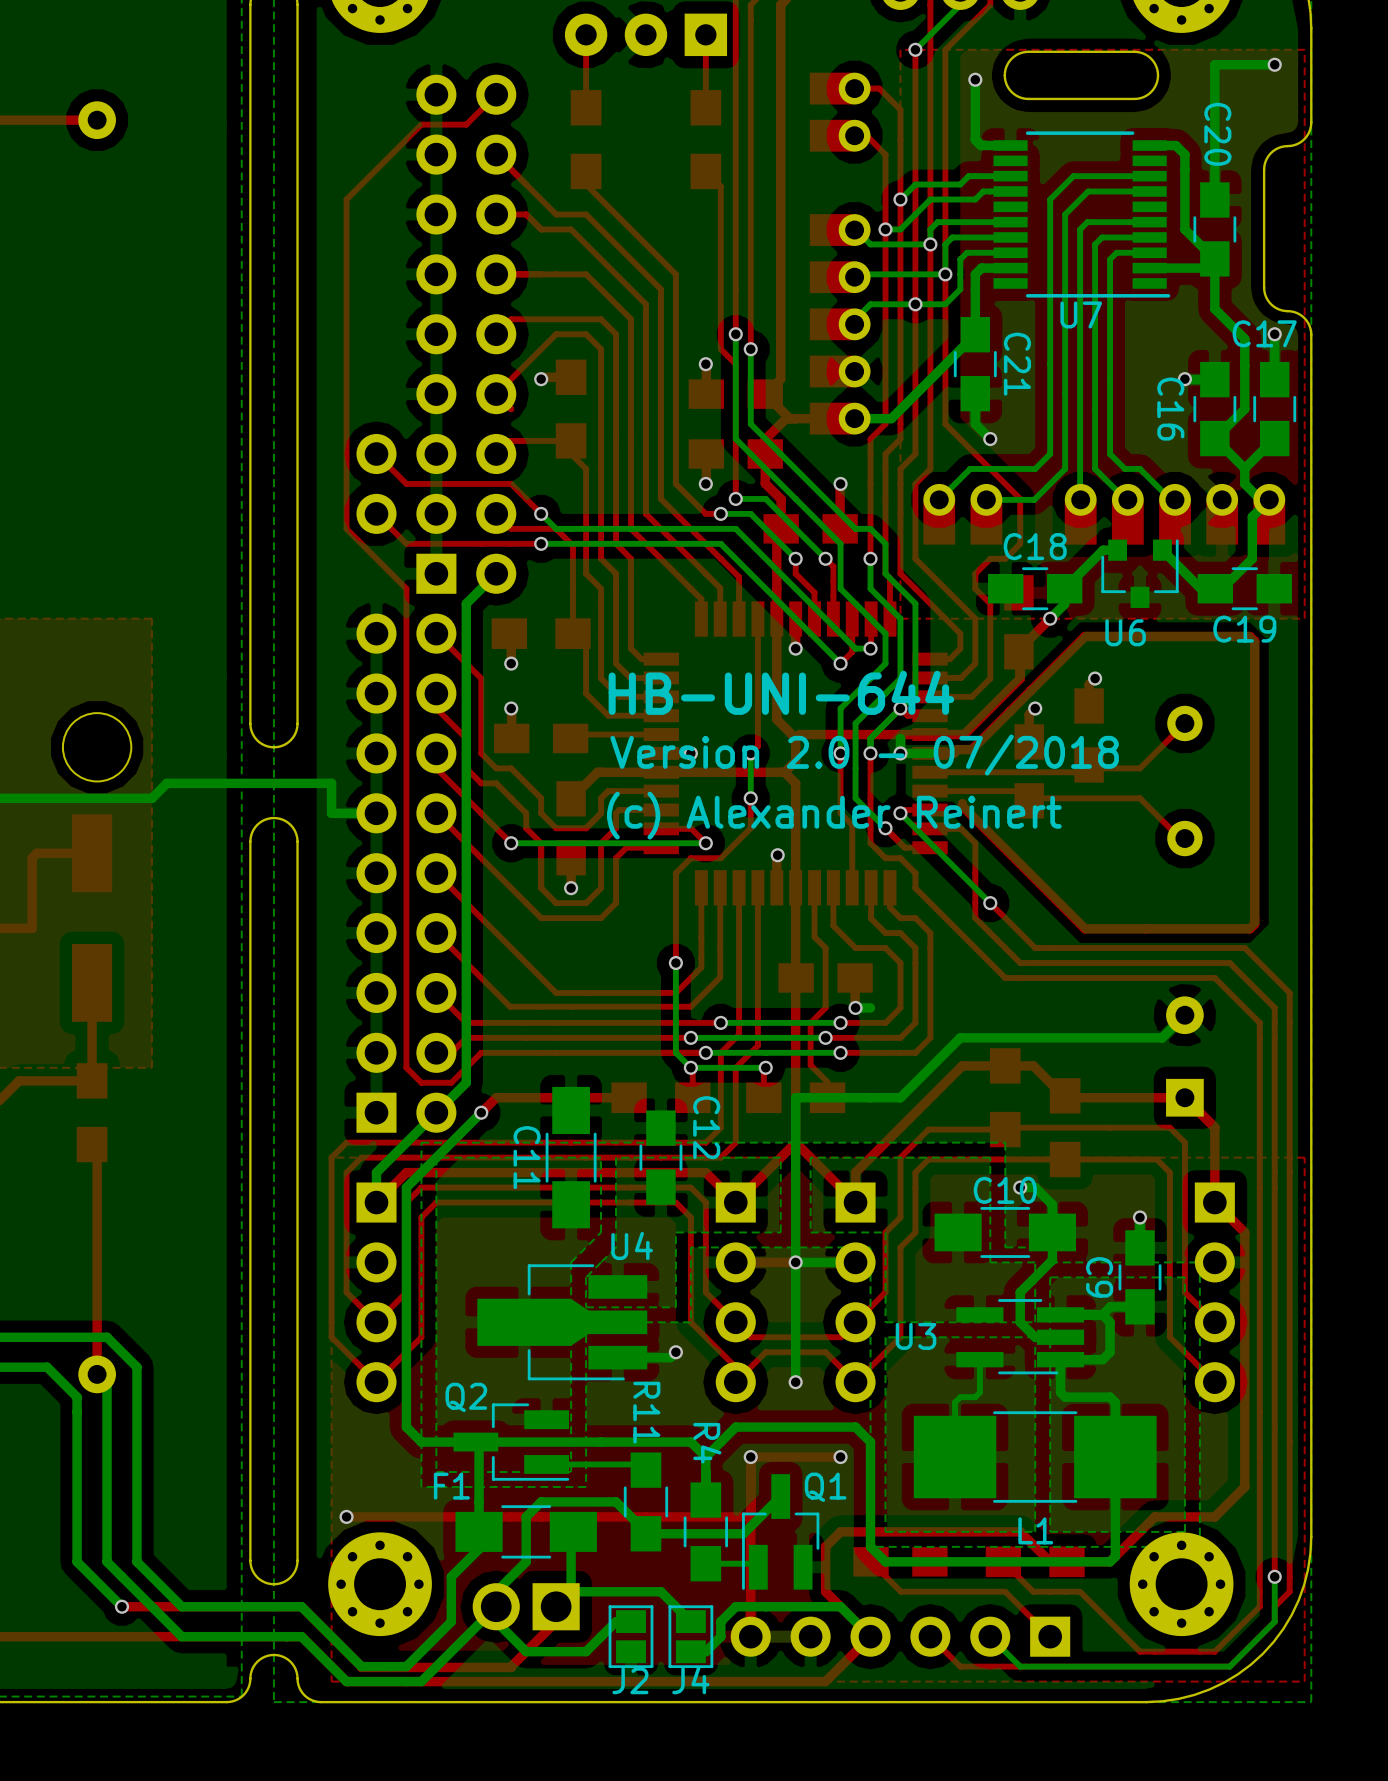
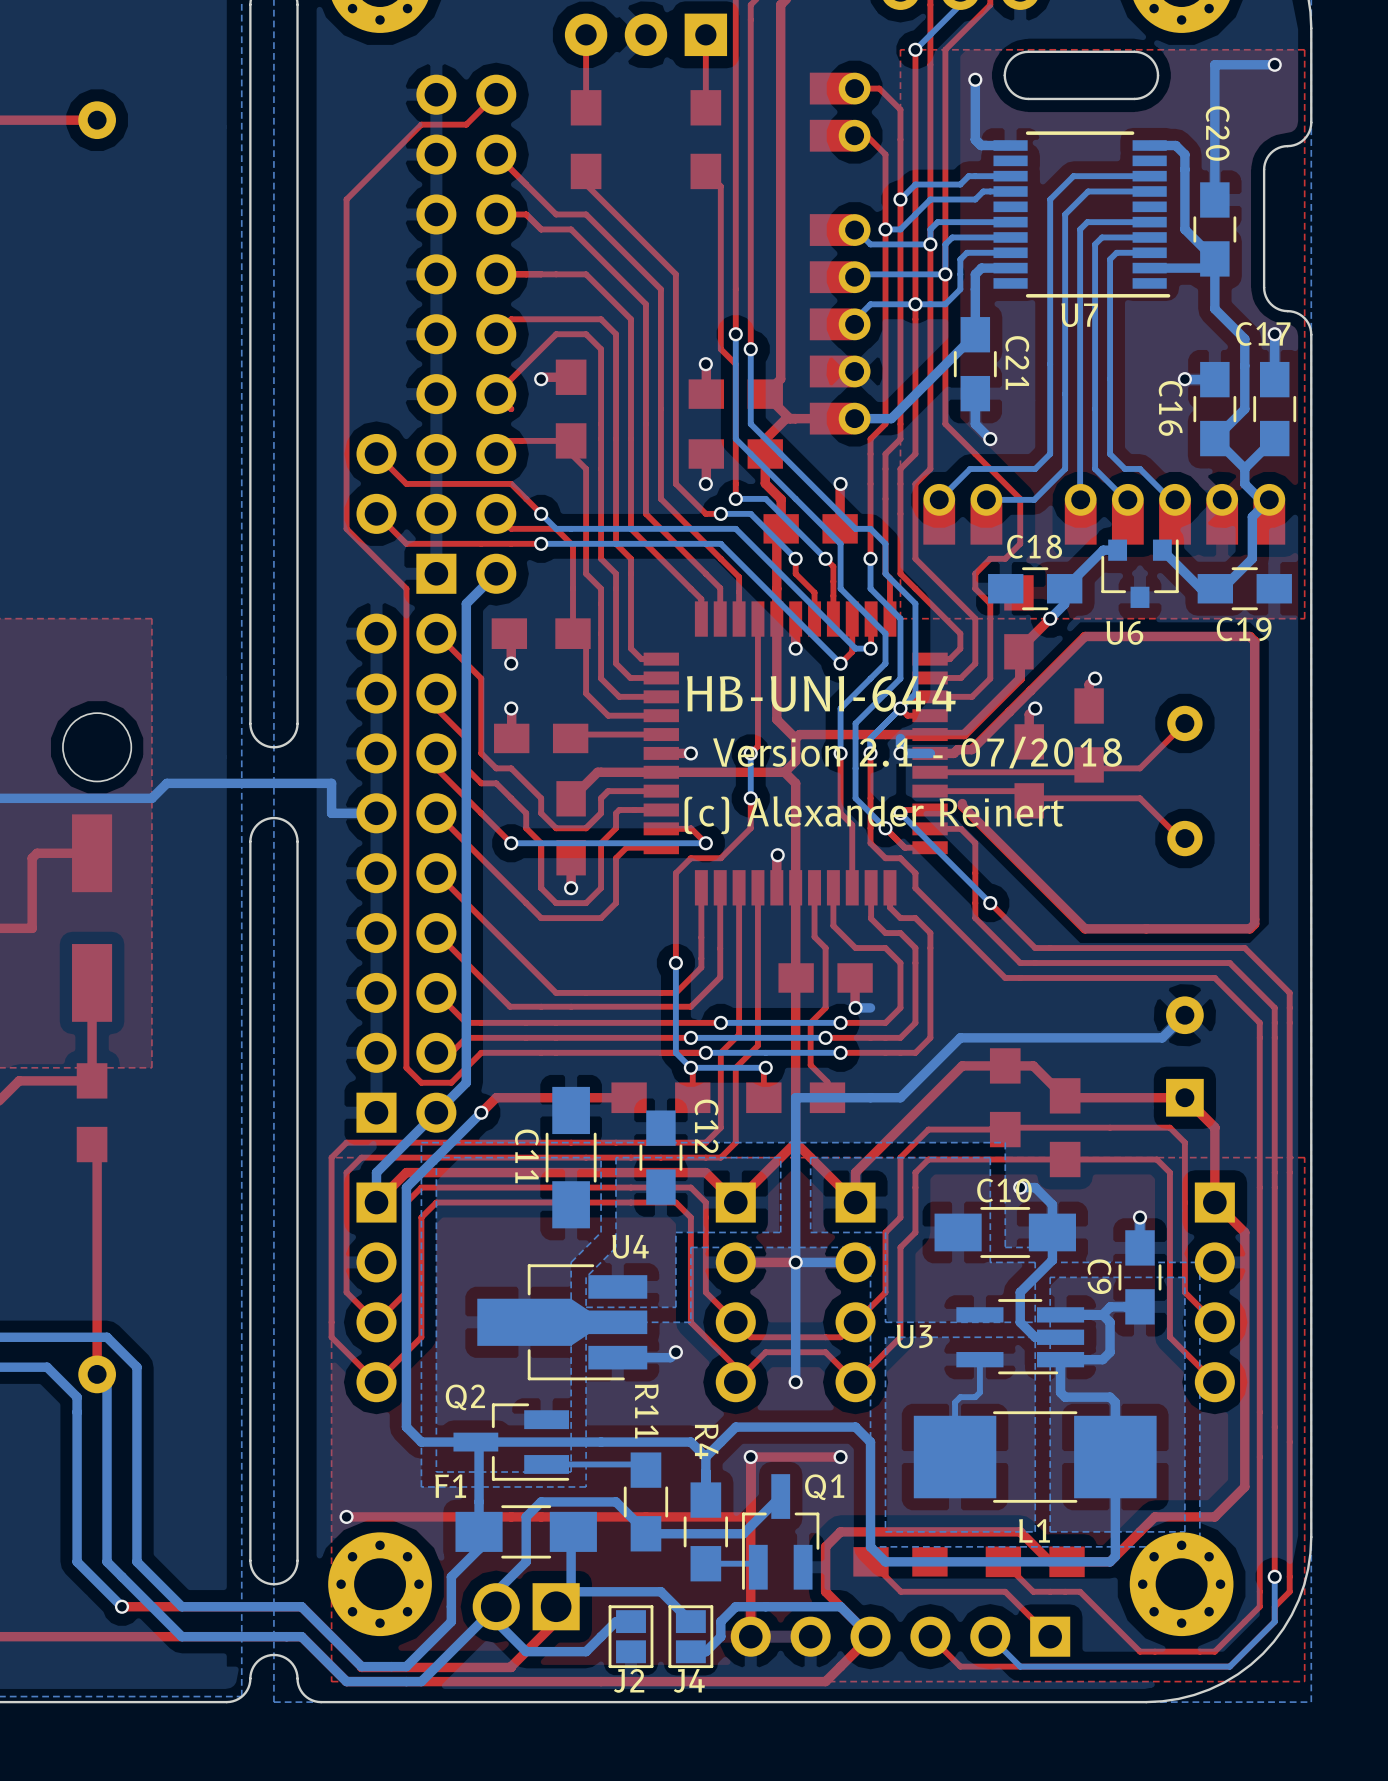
text: Version 2.0 - 07/2018 (864, 755) -> Version 2.1 - 07/2018 (917, 752)

